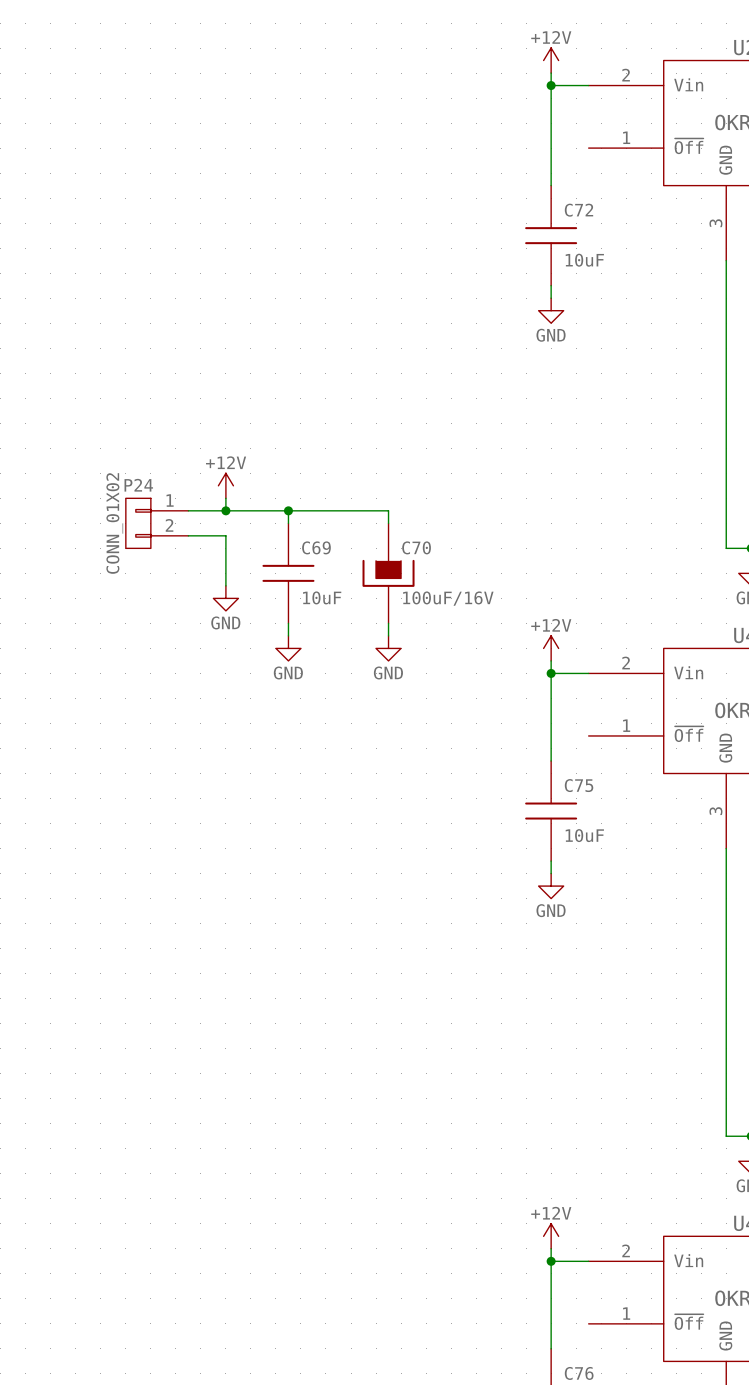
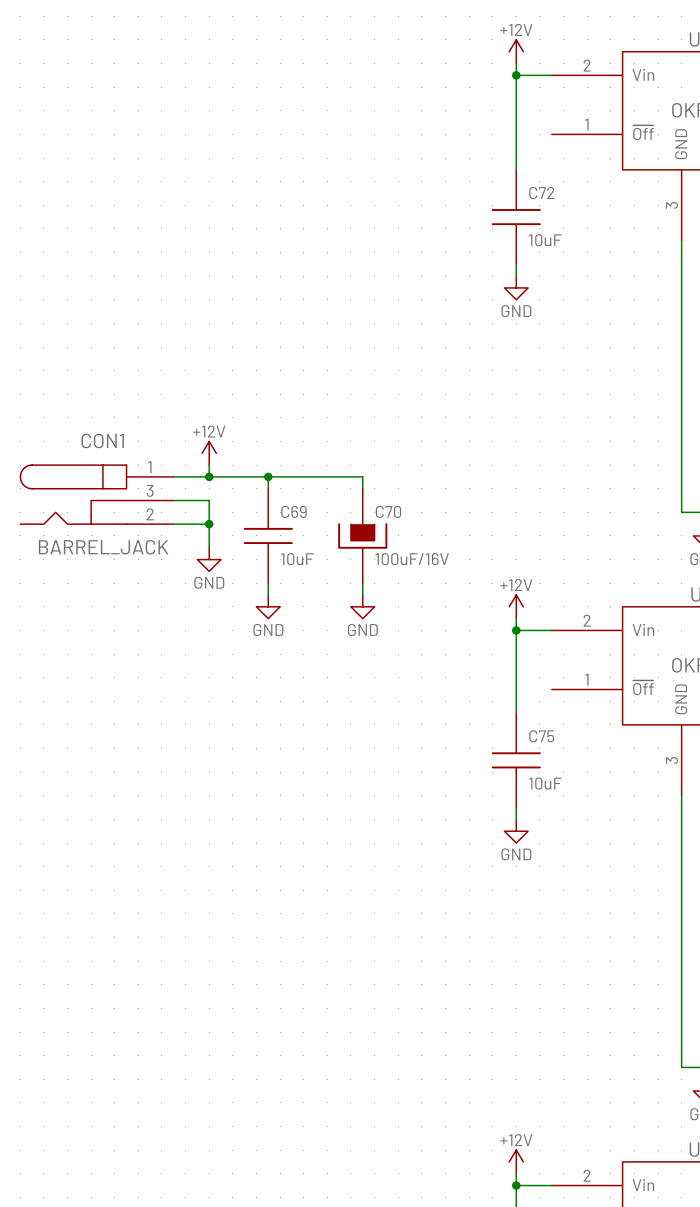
P24: CONN_01X02 (157, 523) -> none
CON1: none -> BARREL_JACK (97, 494)
wire: none -> (173, 524) (209, 524)
junction: none -> (209, 524)

